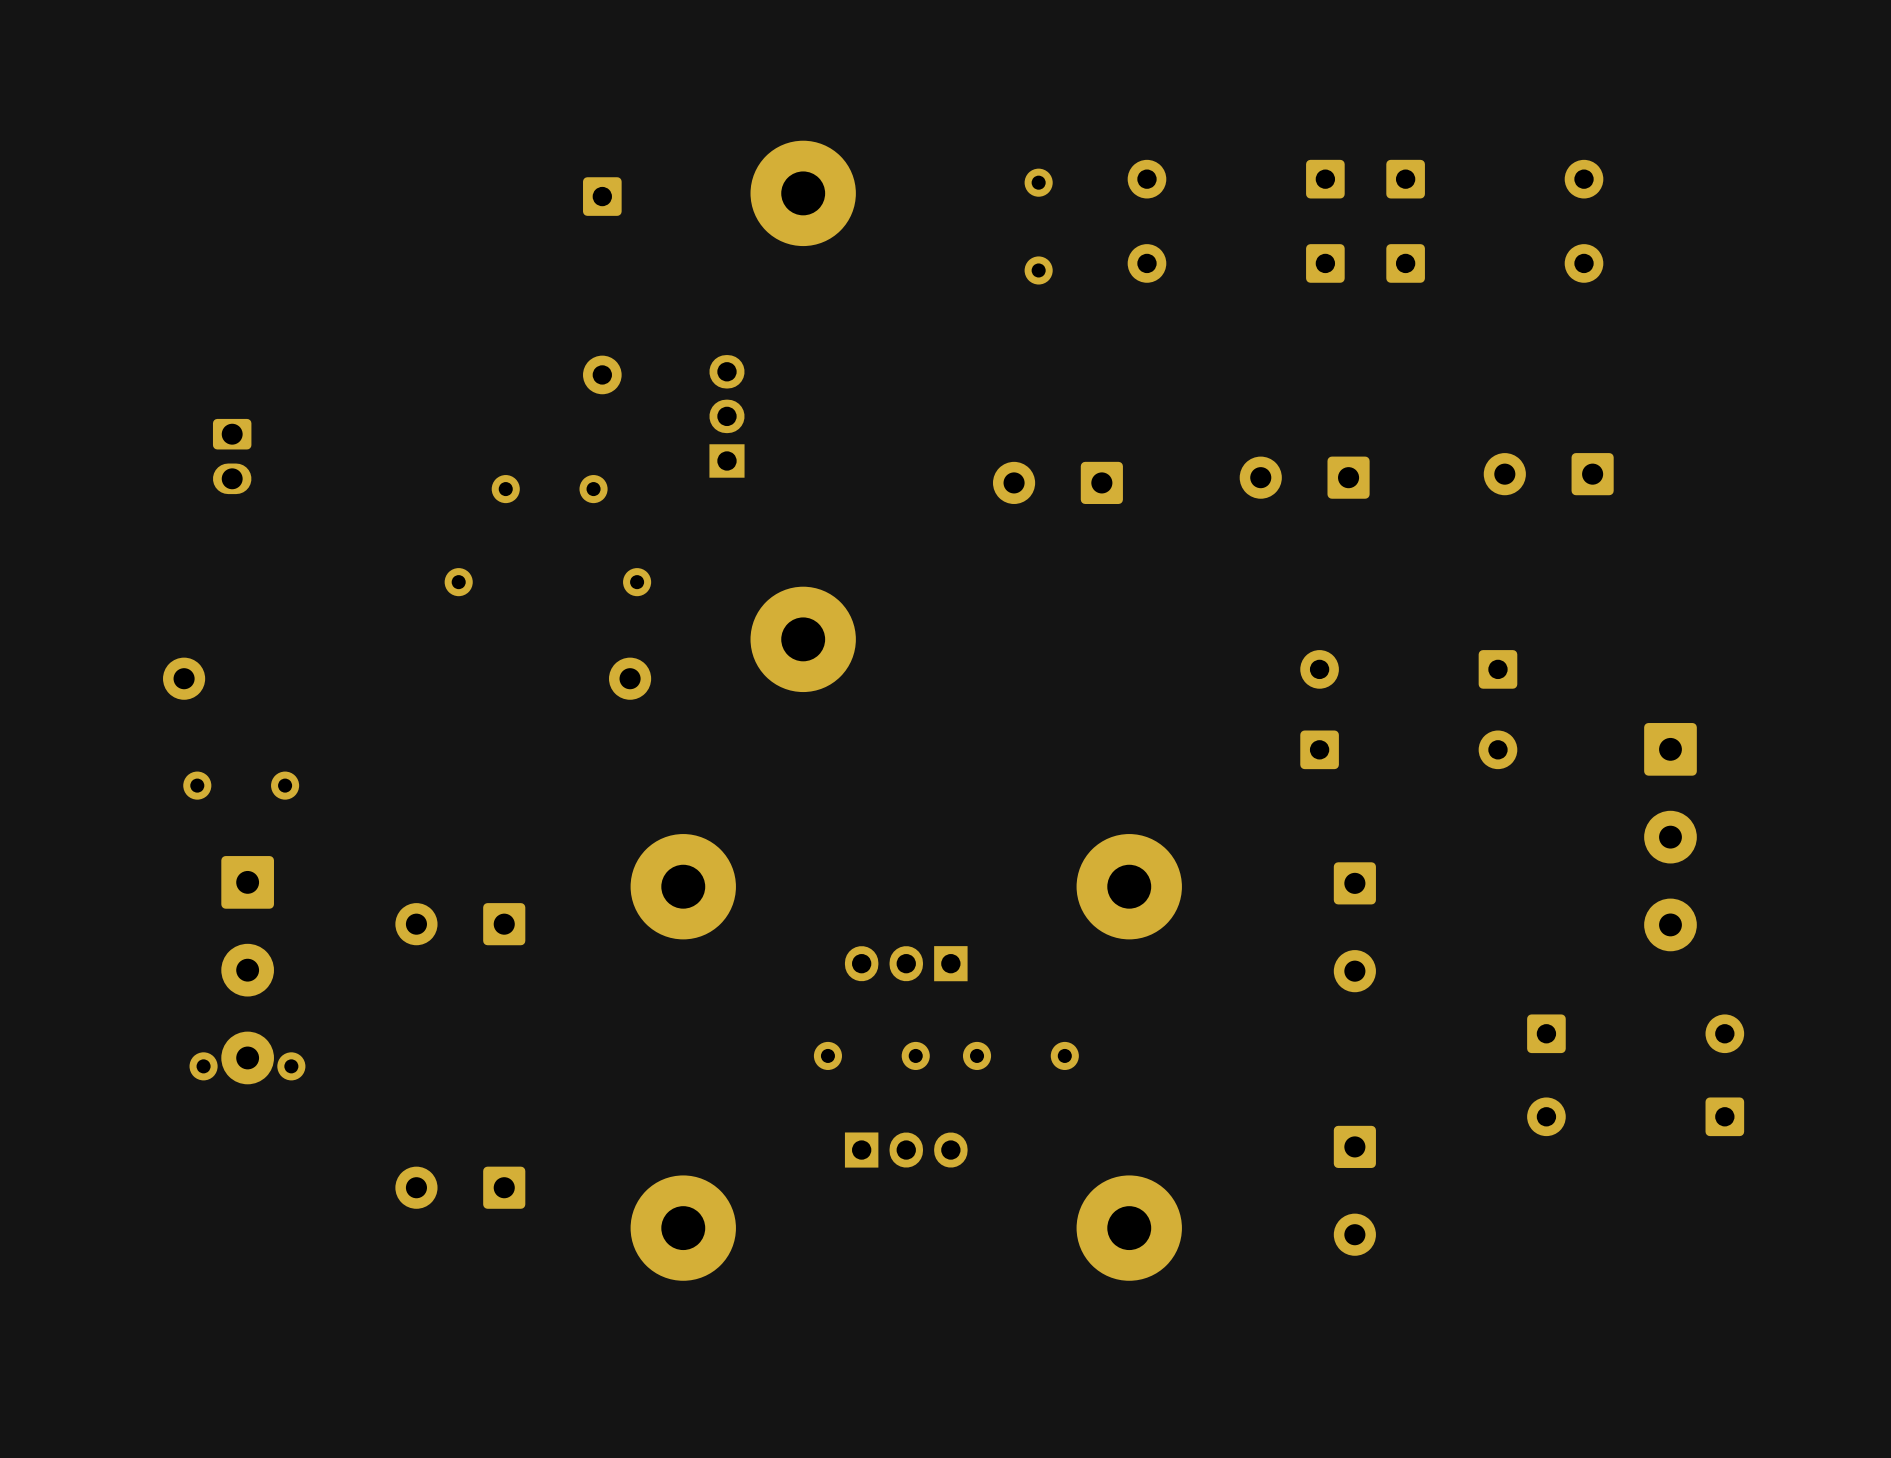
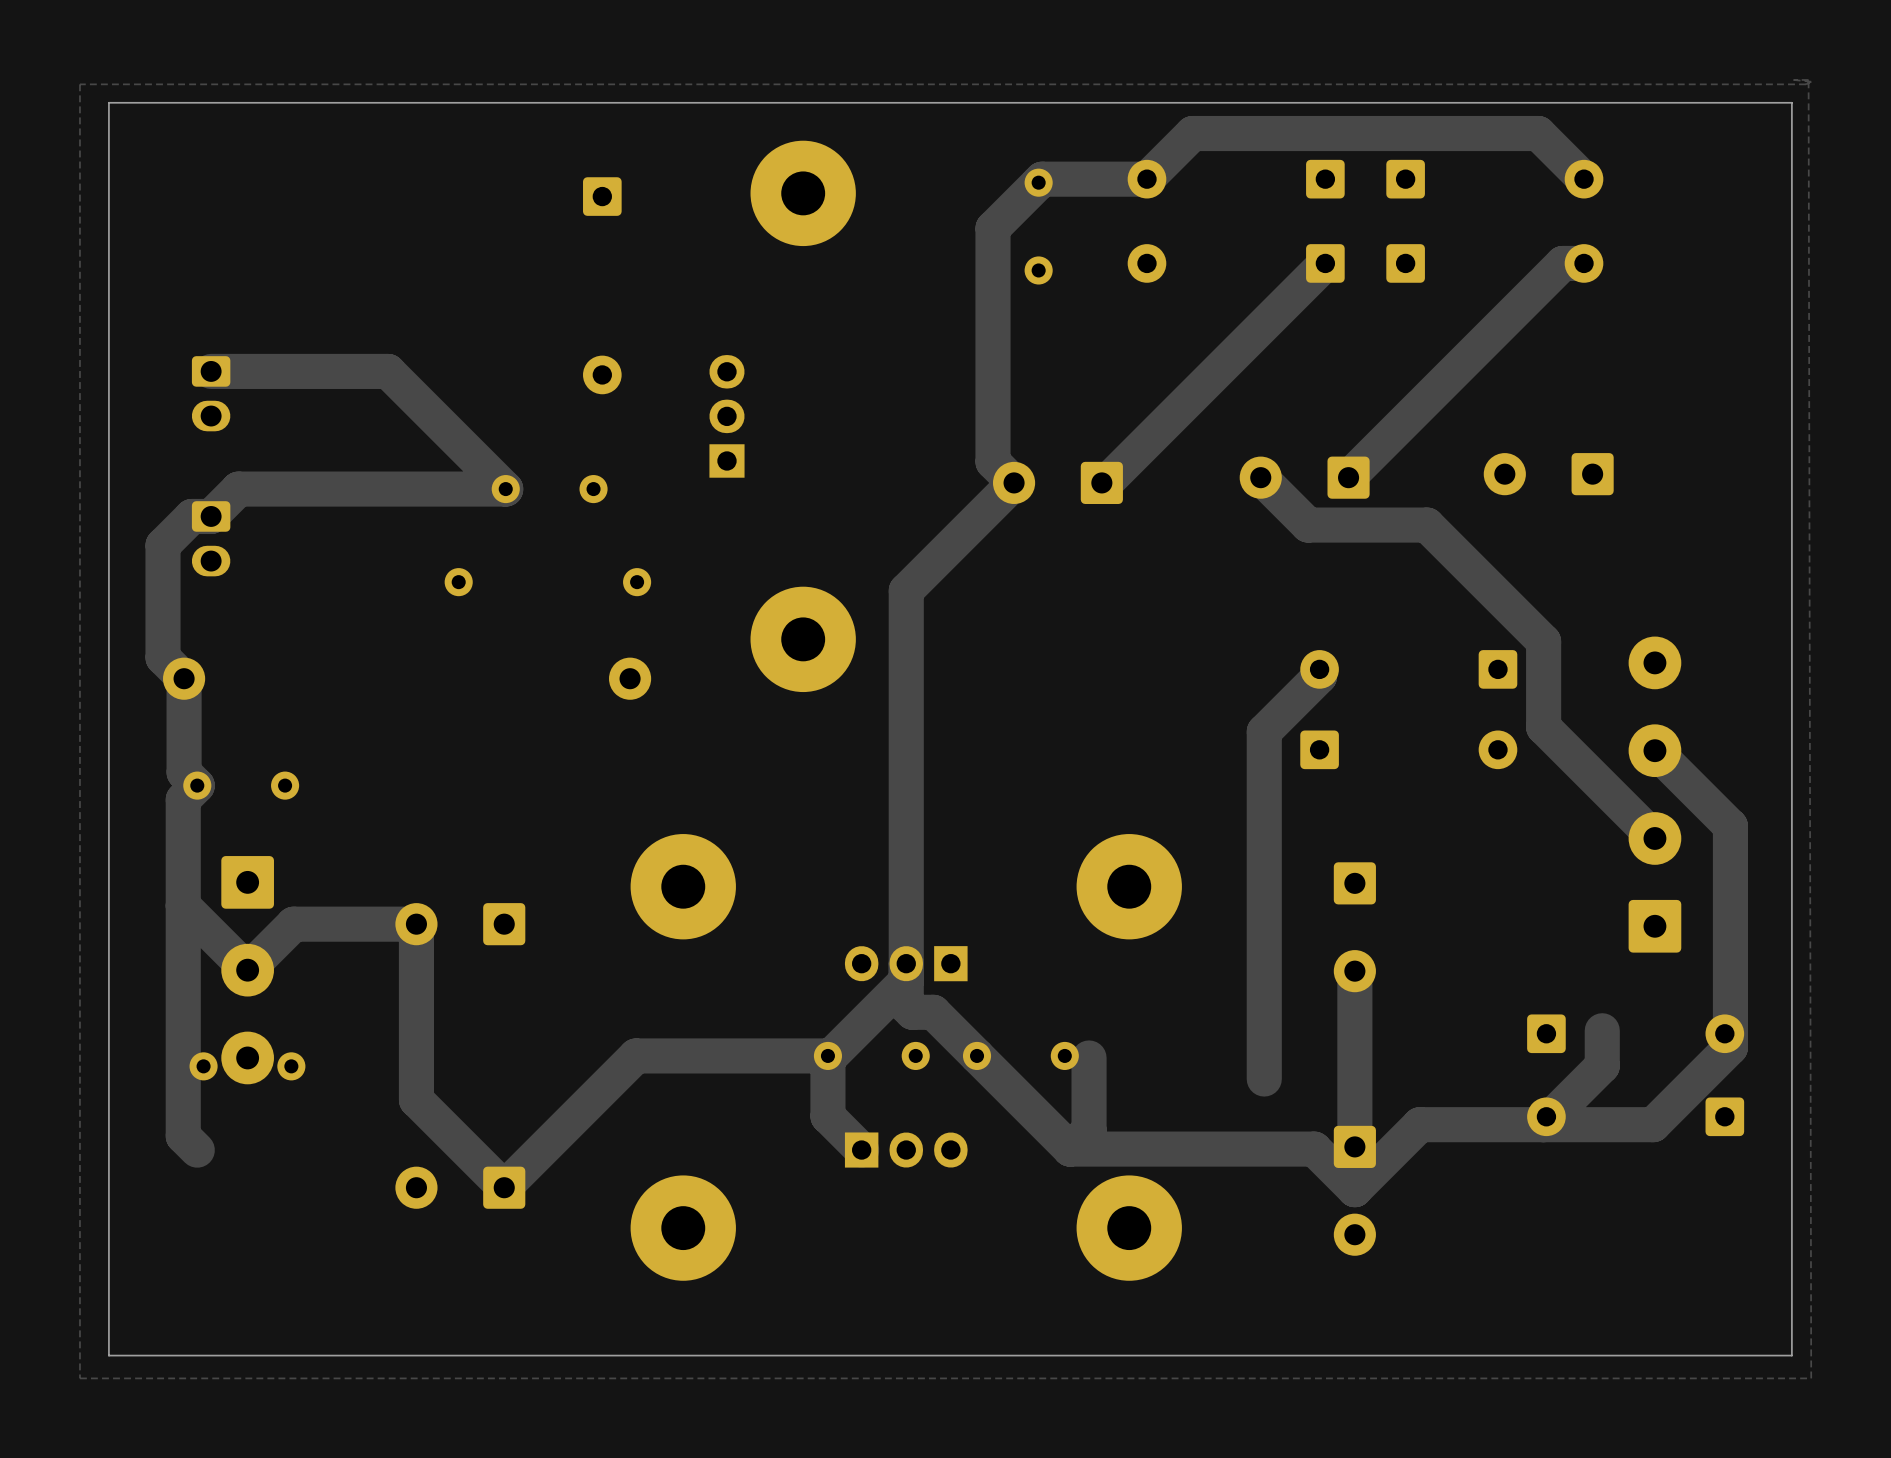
zone outline: none -> (1808, 79) (1811, 1378) (79, 1378) (79, 84) (1805, 84) (1811, 81) (1793, 79) (1808, 79)
board edge: none -> (1791, 102) (108, 102) (108, 1355) (1791, 1355) (1791, 102)
track: none -> (1584, 179) (1538, 133) (1192, 133) (1146, 179) (1042, 179) (993, 228) (993, 461) (1014, 482) (906, 590) (906, 1006) (912, 1012) (933, 1012) (1070, 1149)
track: none -> (1325, 263) (1105, 482)
track: none -> (1584, 263) (1562, 263) (1348, 477)
track: none -> (211, 371) (388, 371) (505, 489) (238, 489) (211, 516) (191, 516) (163, 545) (163, 657) (184, 678) (184, 772) (197, 785) (183, 799) (183, 1136) (197, 1150)
part: none -> (211, 393)
part: (232, 456) -> none
track: none -> (1260, 477) (1308, 525) (1427, 525) (1543, 641) (1543, 727) (1654, 838)
part: none -> (211, 538)
track: none -> (1319, 669) (1319, 676) (1264, 731) (1264, 1079)
track: none -> (1654, 750) (1730, 826) (1730, 1047) (1653, 1124) (1419, 1124) (1354, 1189)
part: none -> (1654, 794)
part: (1670, 837) -> none
track: none -> (183, 905) (247, 970) (293, 924) (416, 924) (416, 1099) (504, 1187) (636, 1055) (831, 1055) (906, 980)
track: none -> (1354, 971) (1354, 1189)
track: none -> (1602, 1030) (1602, 1065) (1543, 1124)
track: none -> (827, 1055) (827, 1116) (861, 1150)
track: none -> (1089, 1057) (1089, 1130) (1070, 1149)
track: none -> (1070, 1149) (1314, 1149) (1354, 1189)

